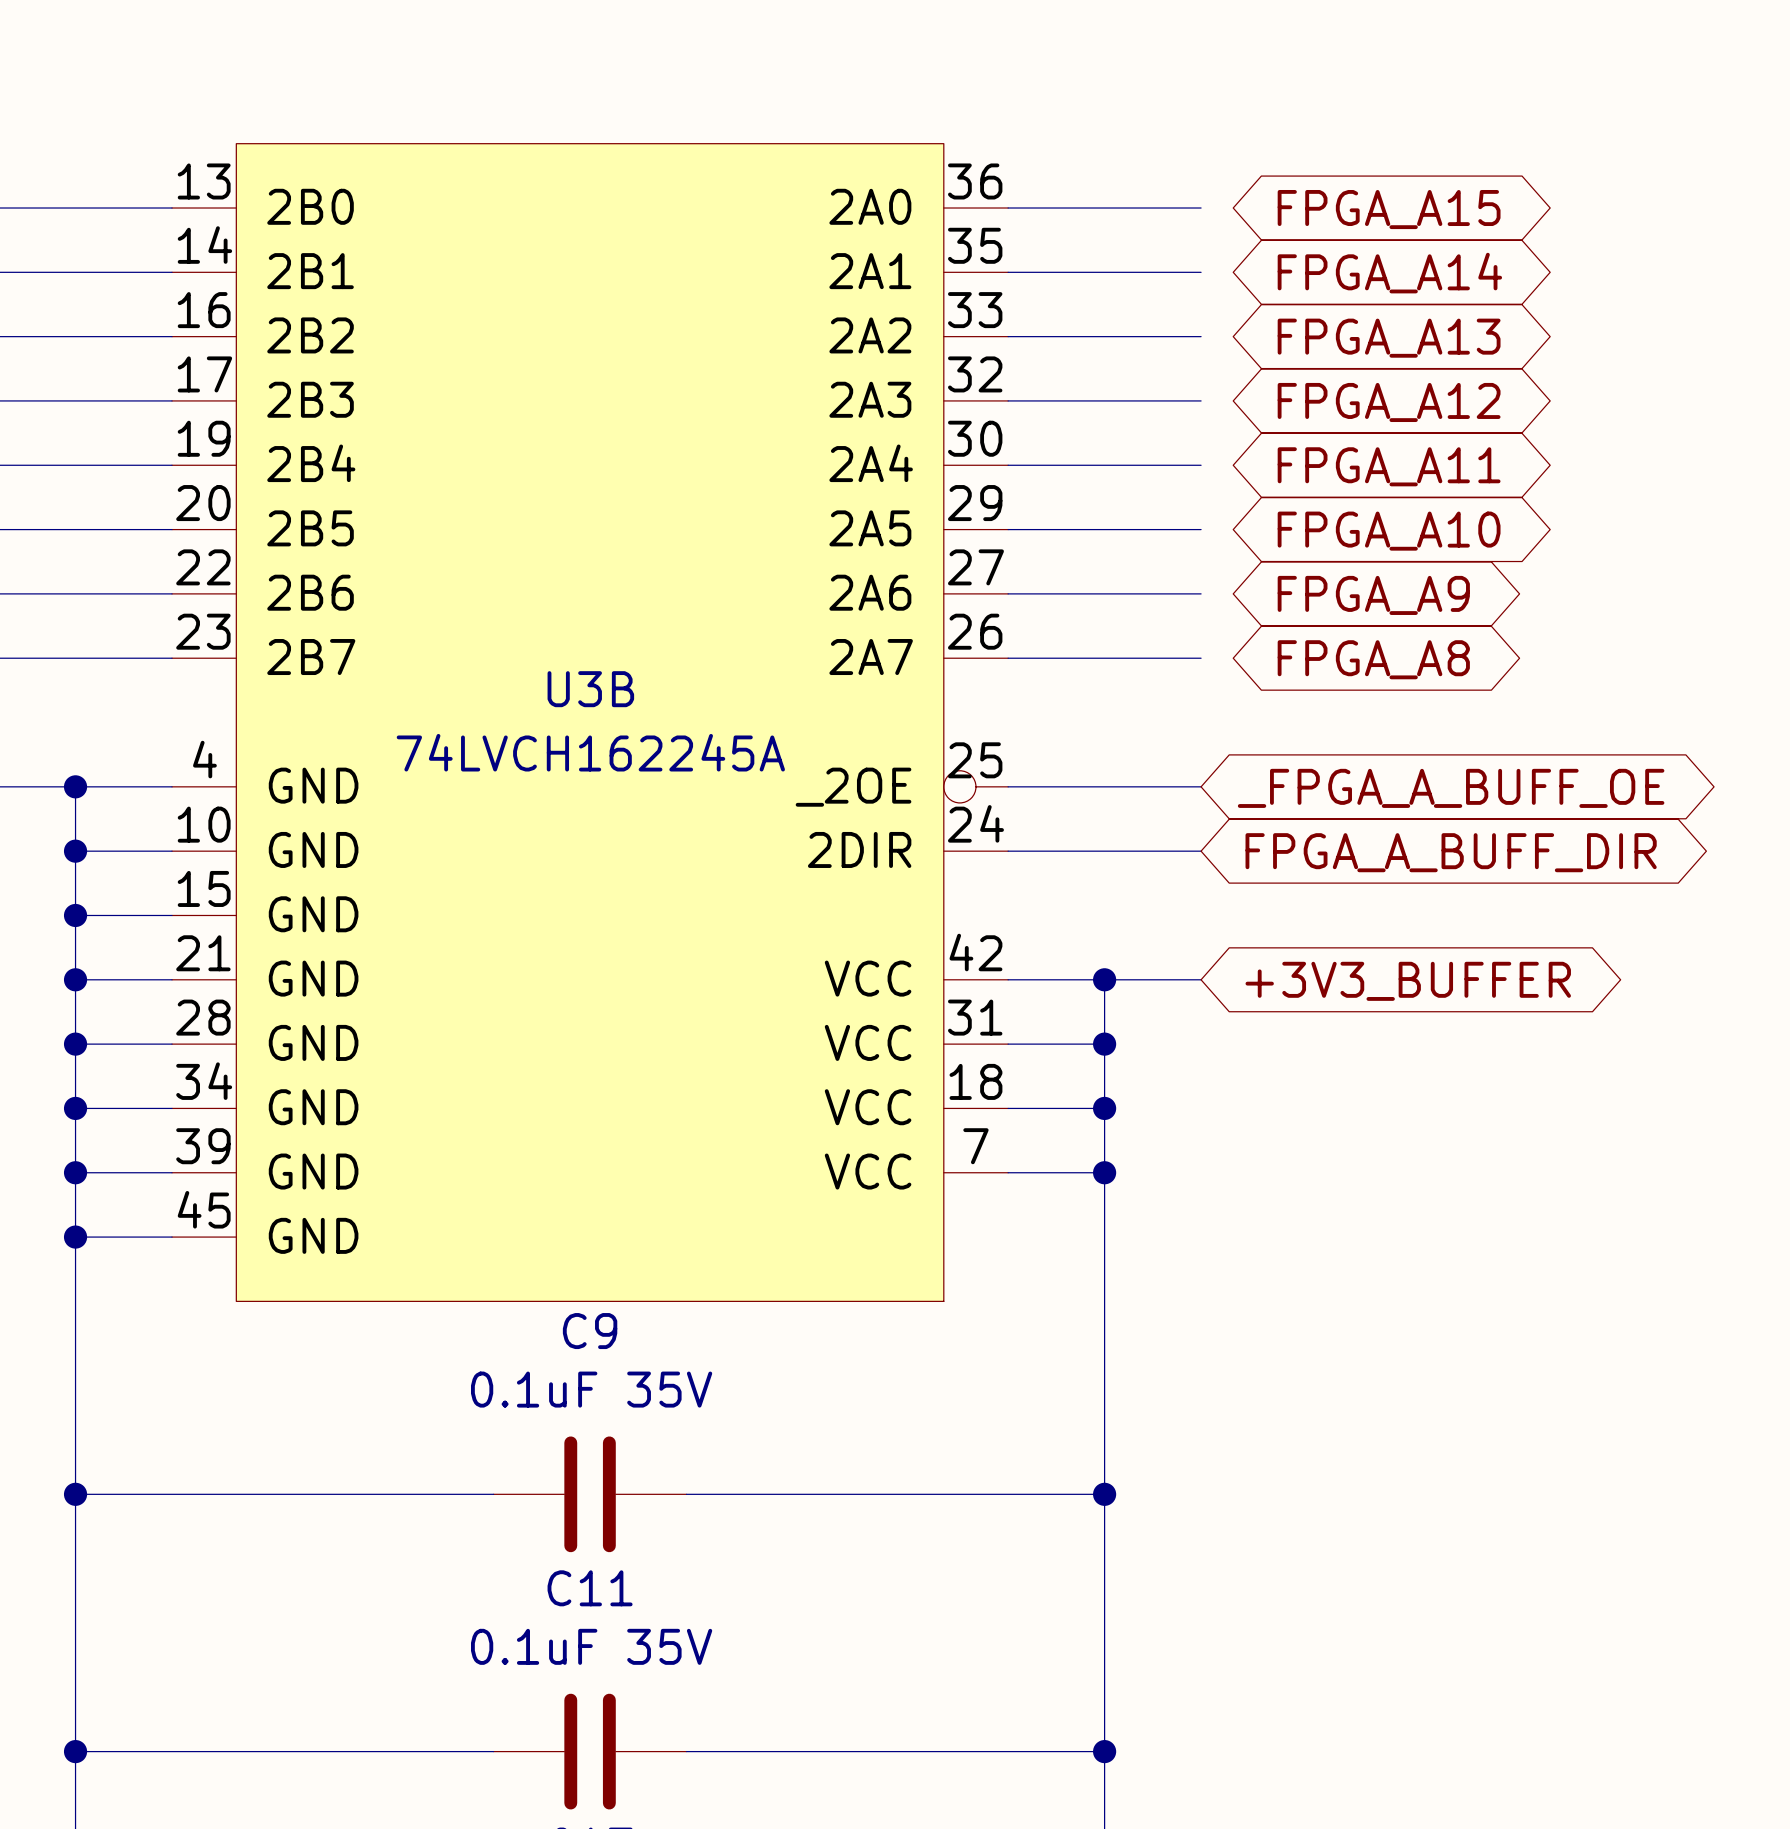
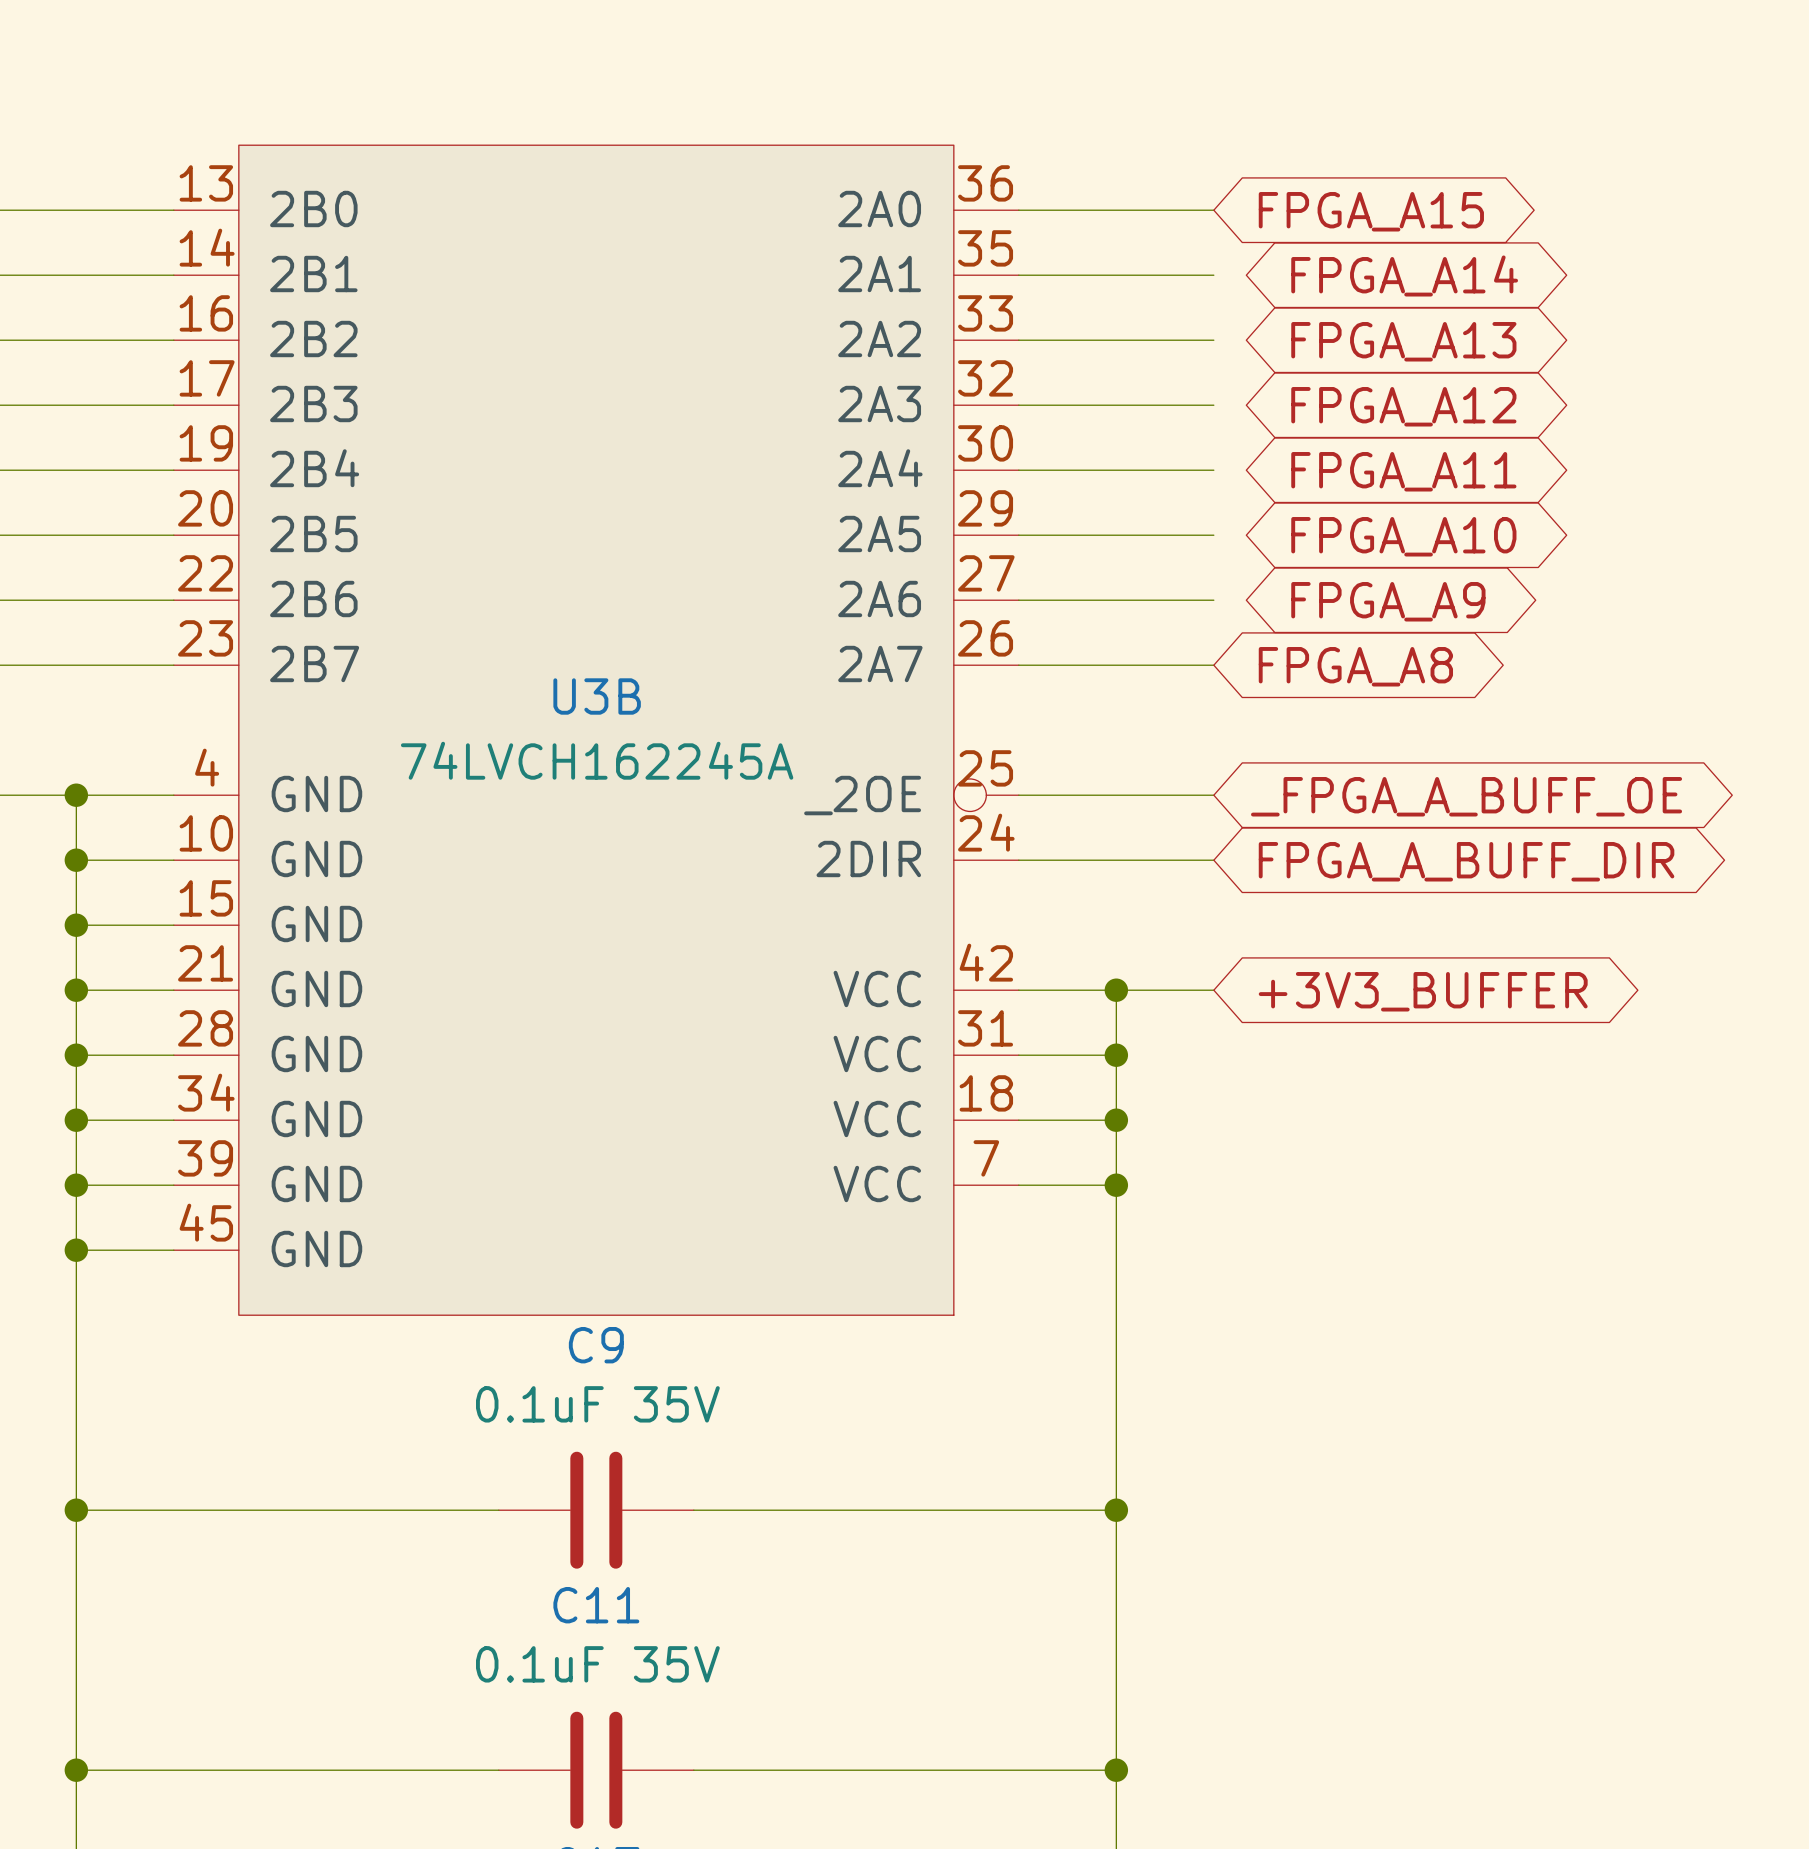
global label position: FPGA_A15 (1389, 209) -> FPGA_A15 (1371, 211)
global label position: FPGA_A8 (1373, 659) -> FPGA_A8 (1355, 666)

